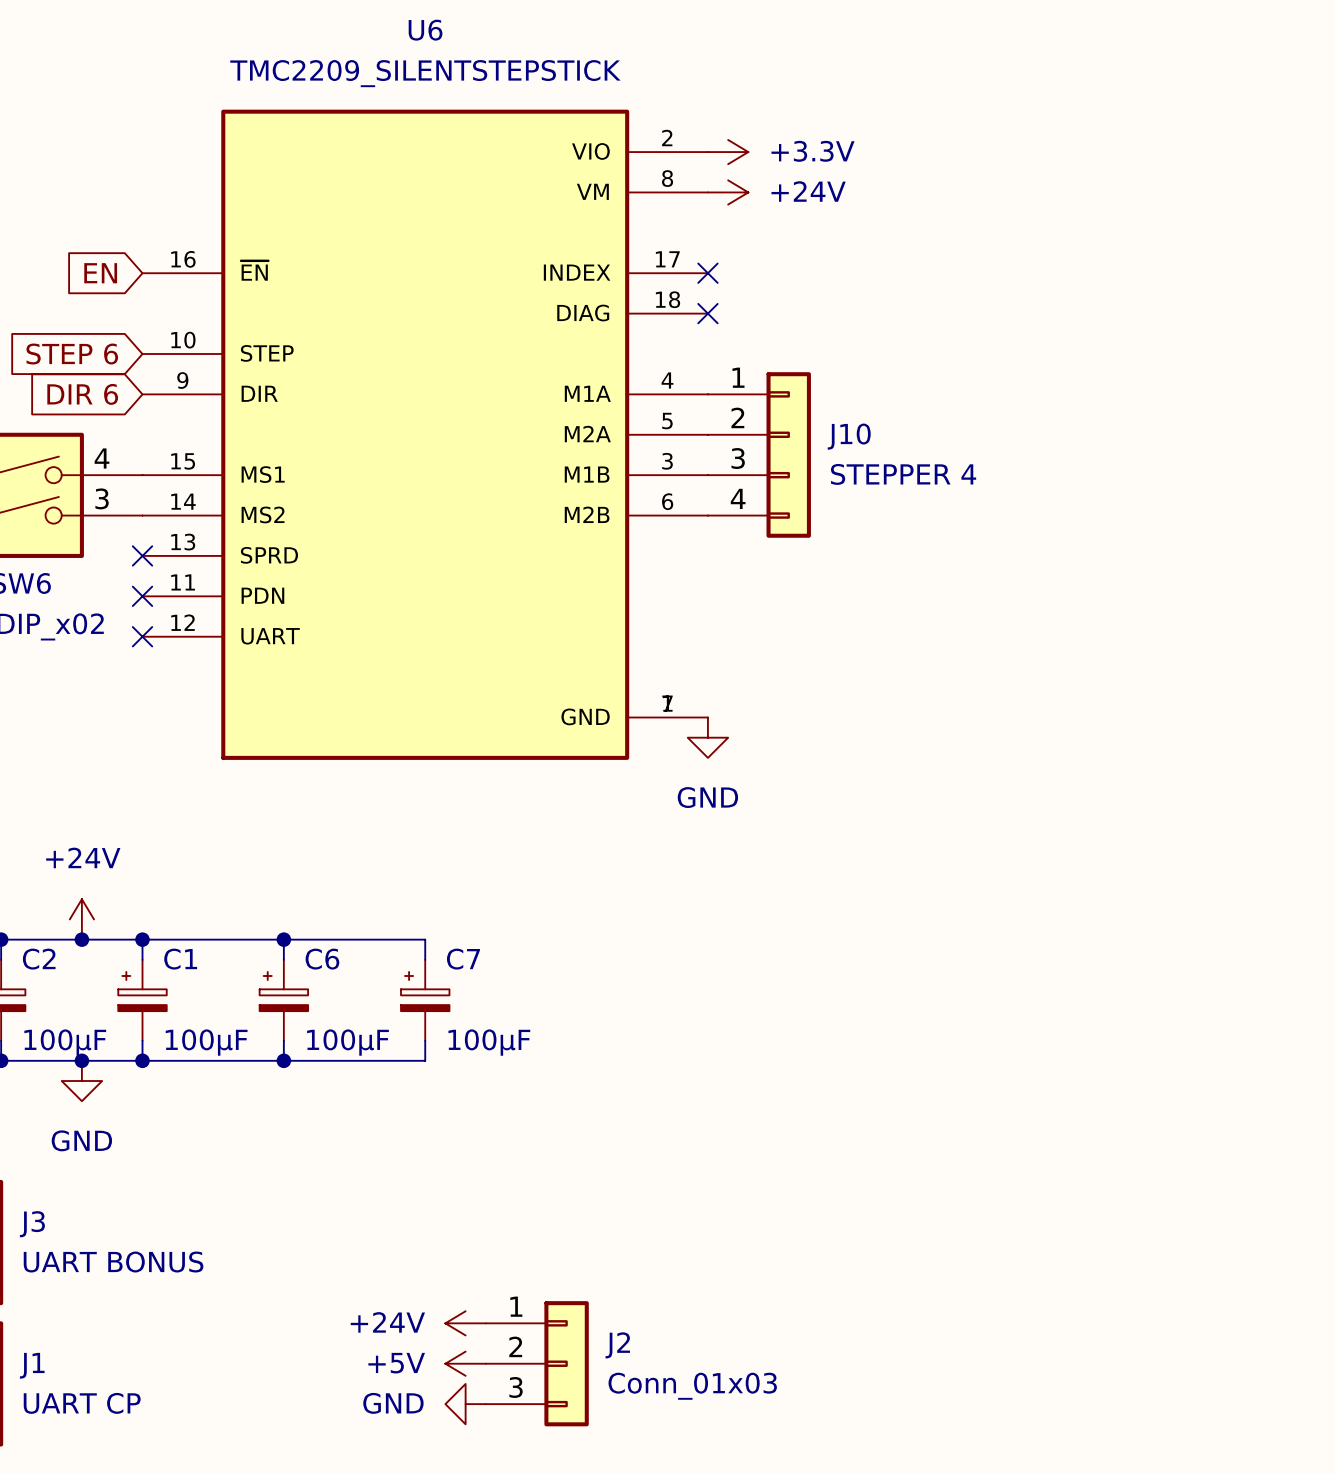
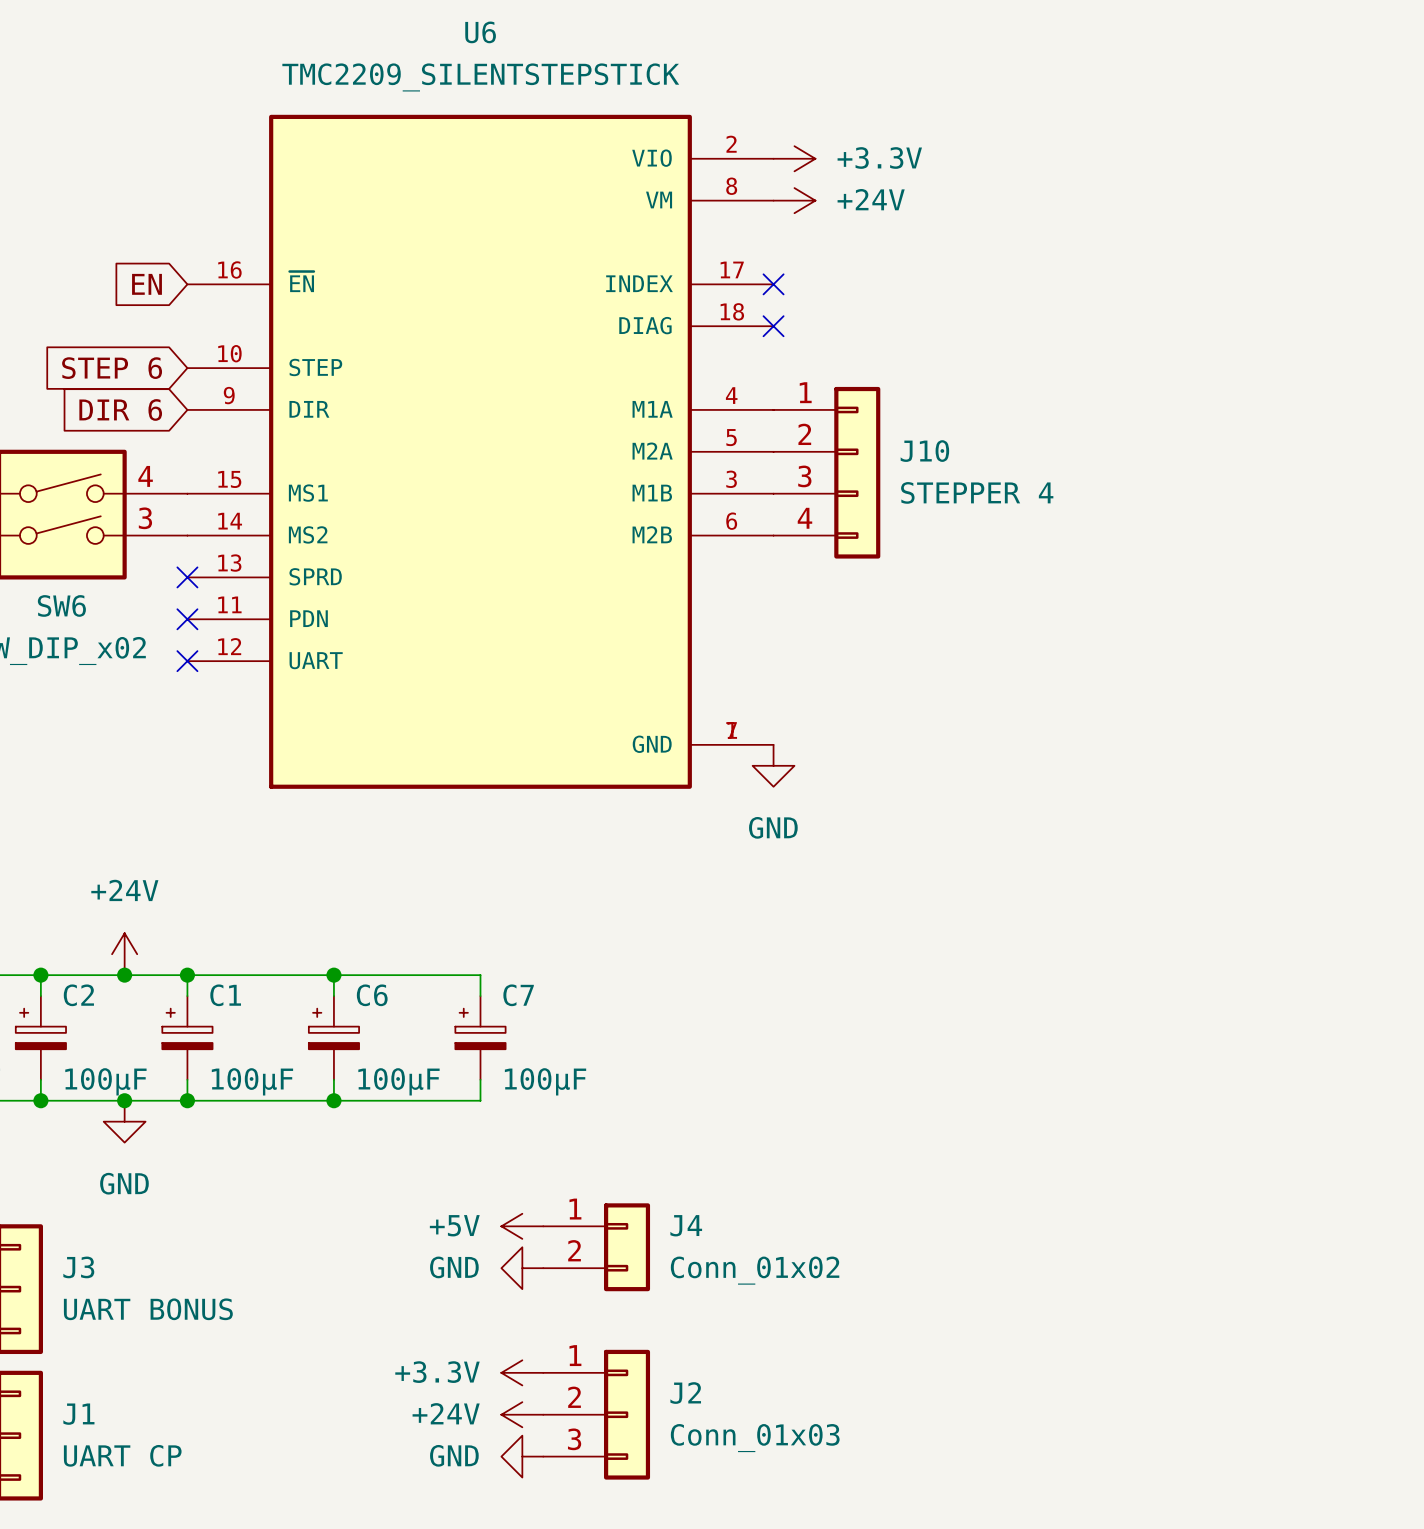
power symbol: none -> +5V (522, 1226)
J4: none -> Conn_01x02 (596, 1247)
power symbol: none -> GND (522, 1268)
power symbol: +24V (465, 1323) -> +3.3V (522, 1372)
power symbol: +5V (465, 1363) -> +24V (522, 1414)

